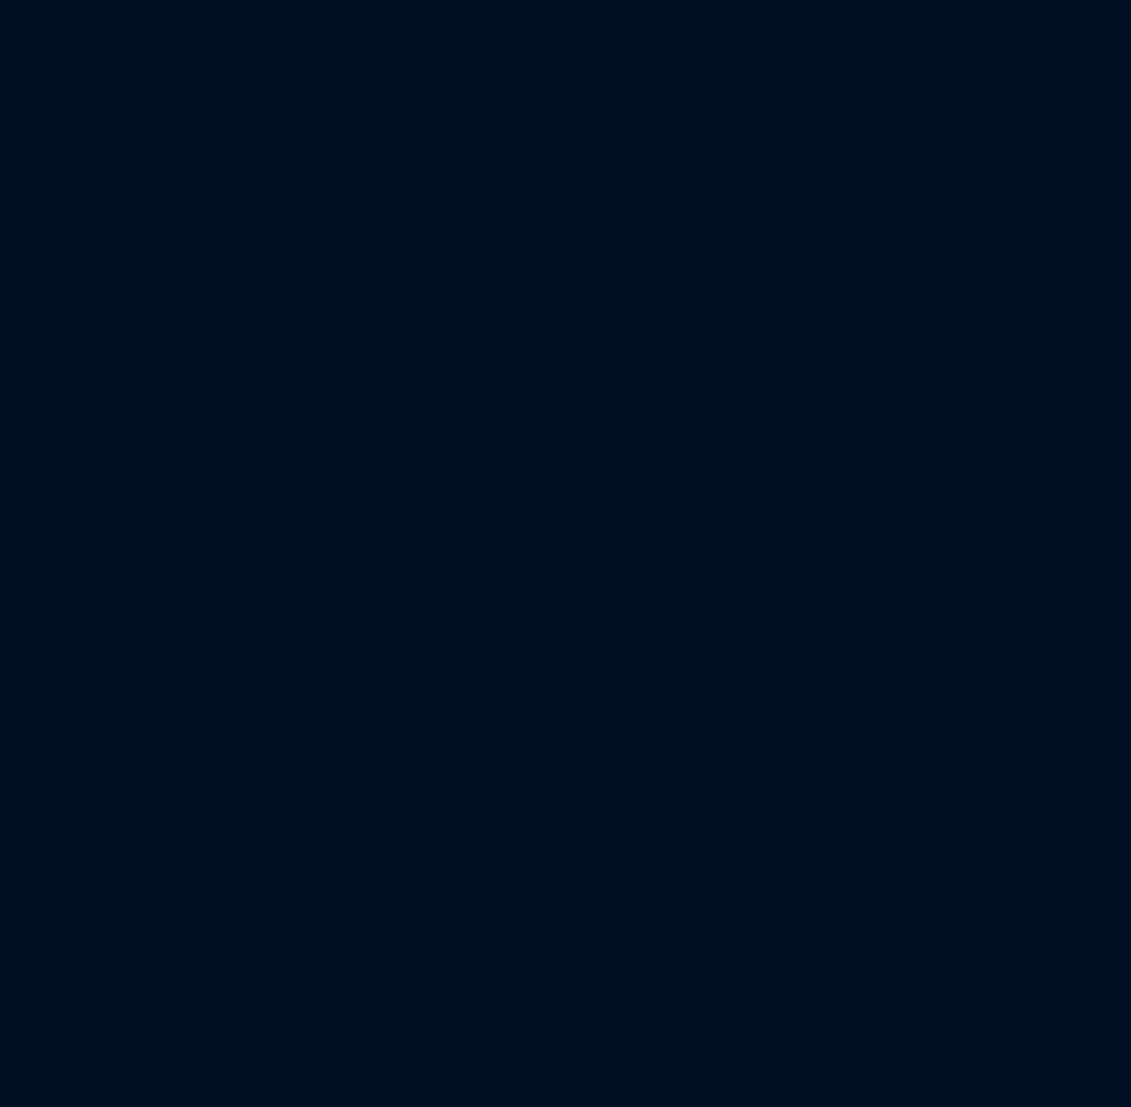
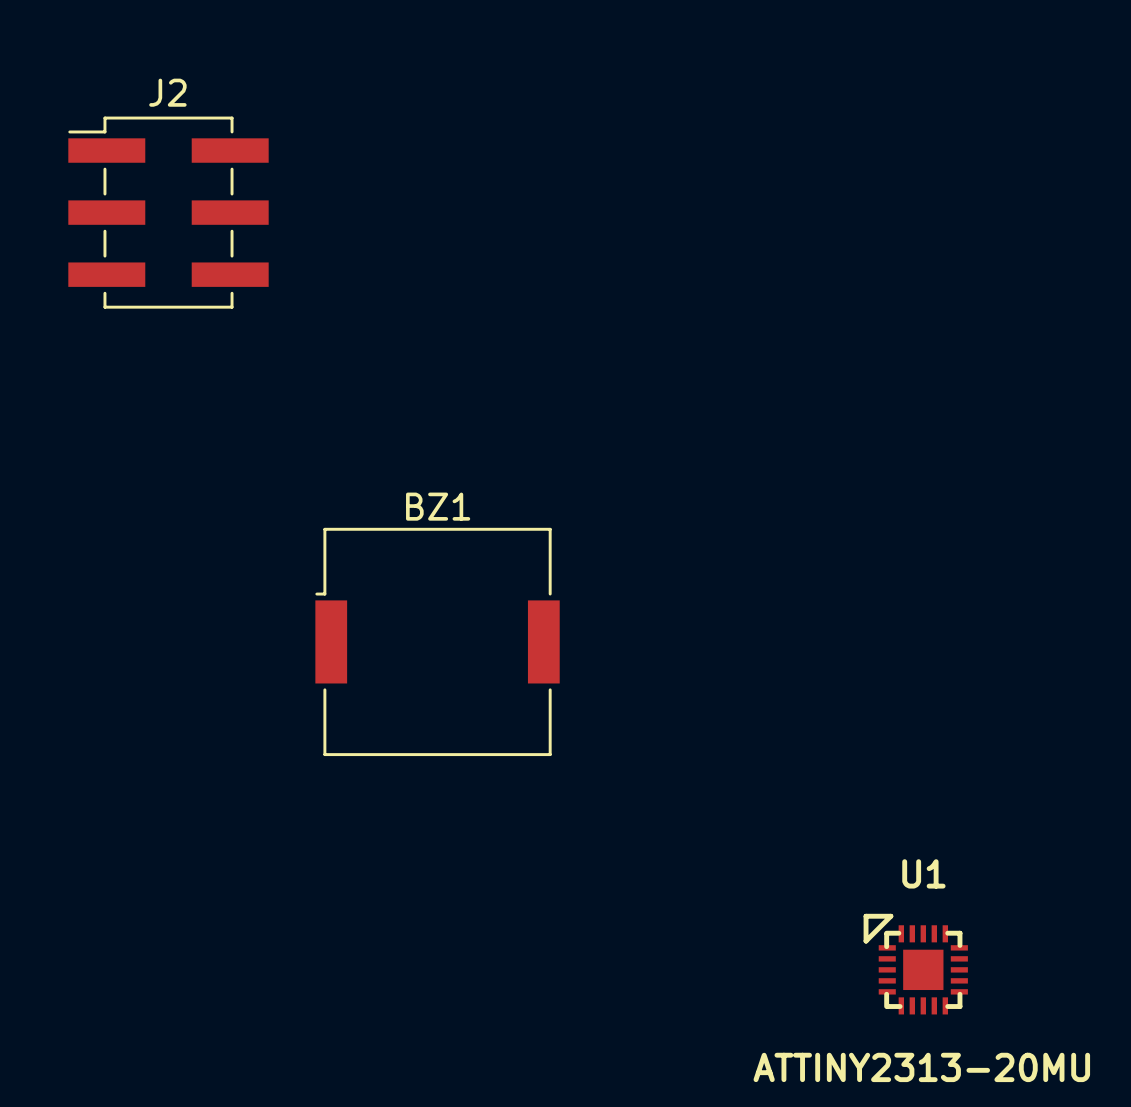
J2: none -> (168, 212)
BZ1: none -> (437, 641)
U1: none -> ATTINY2313-20MU (915, 964)

